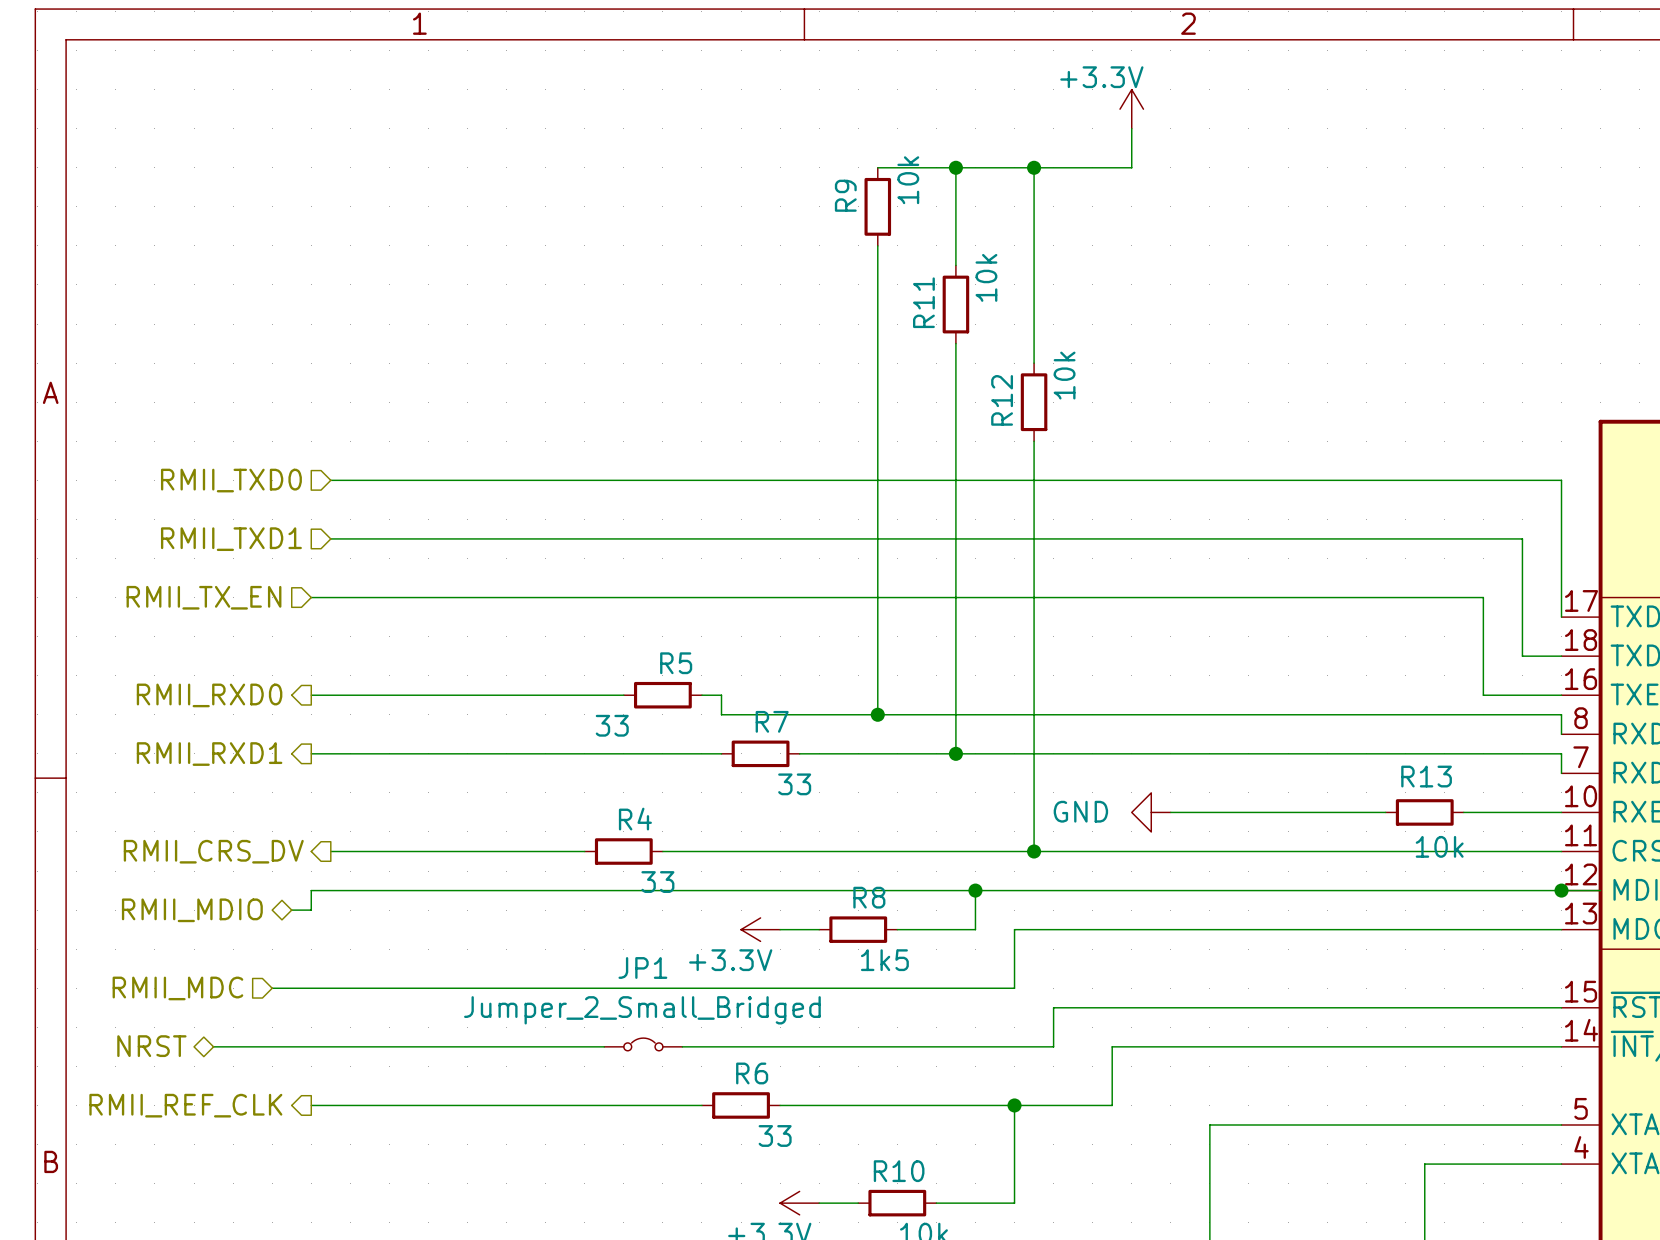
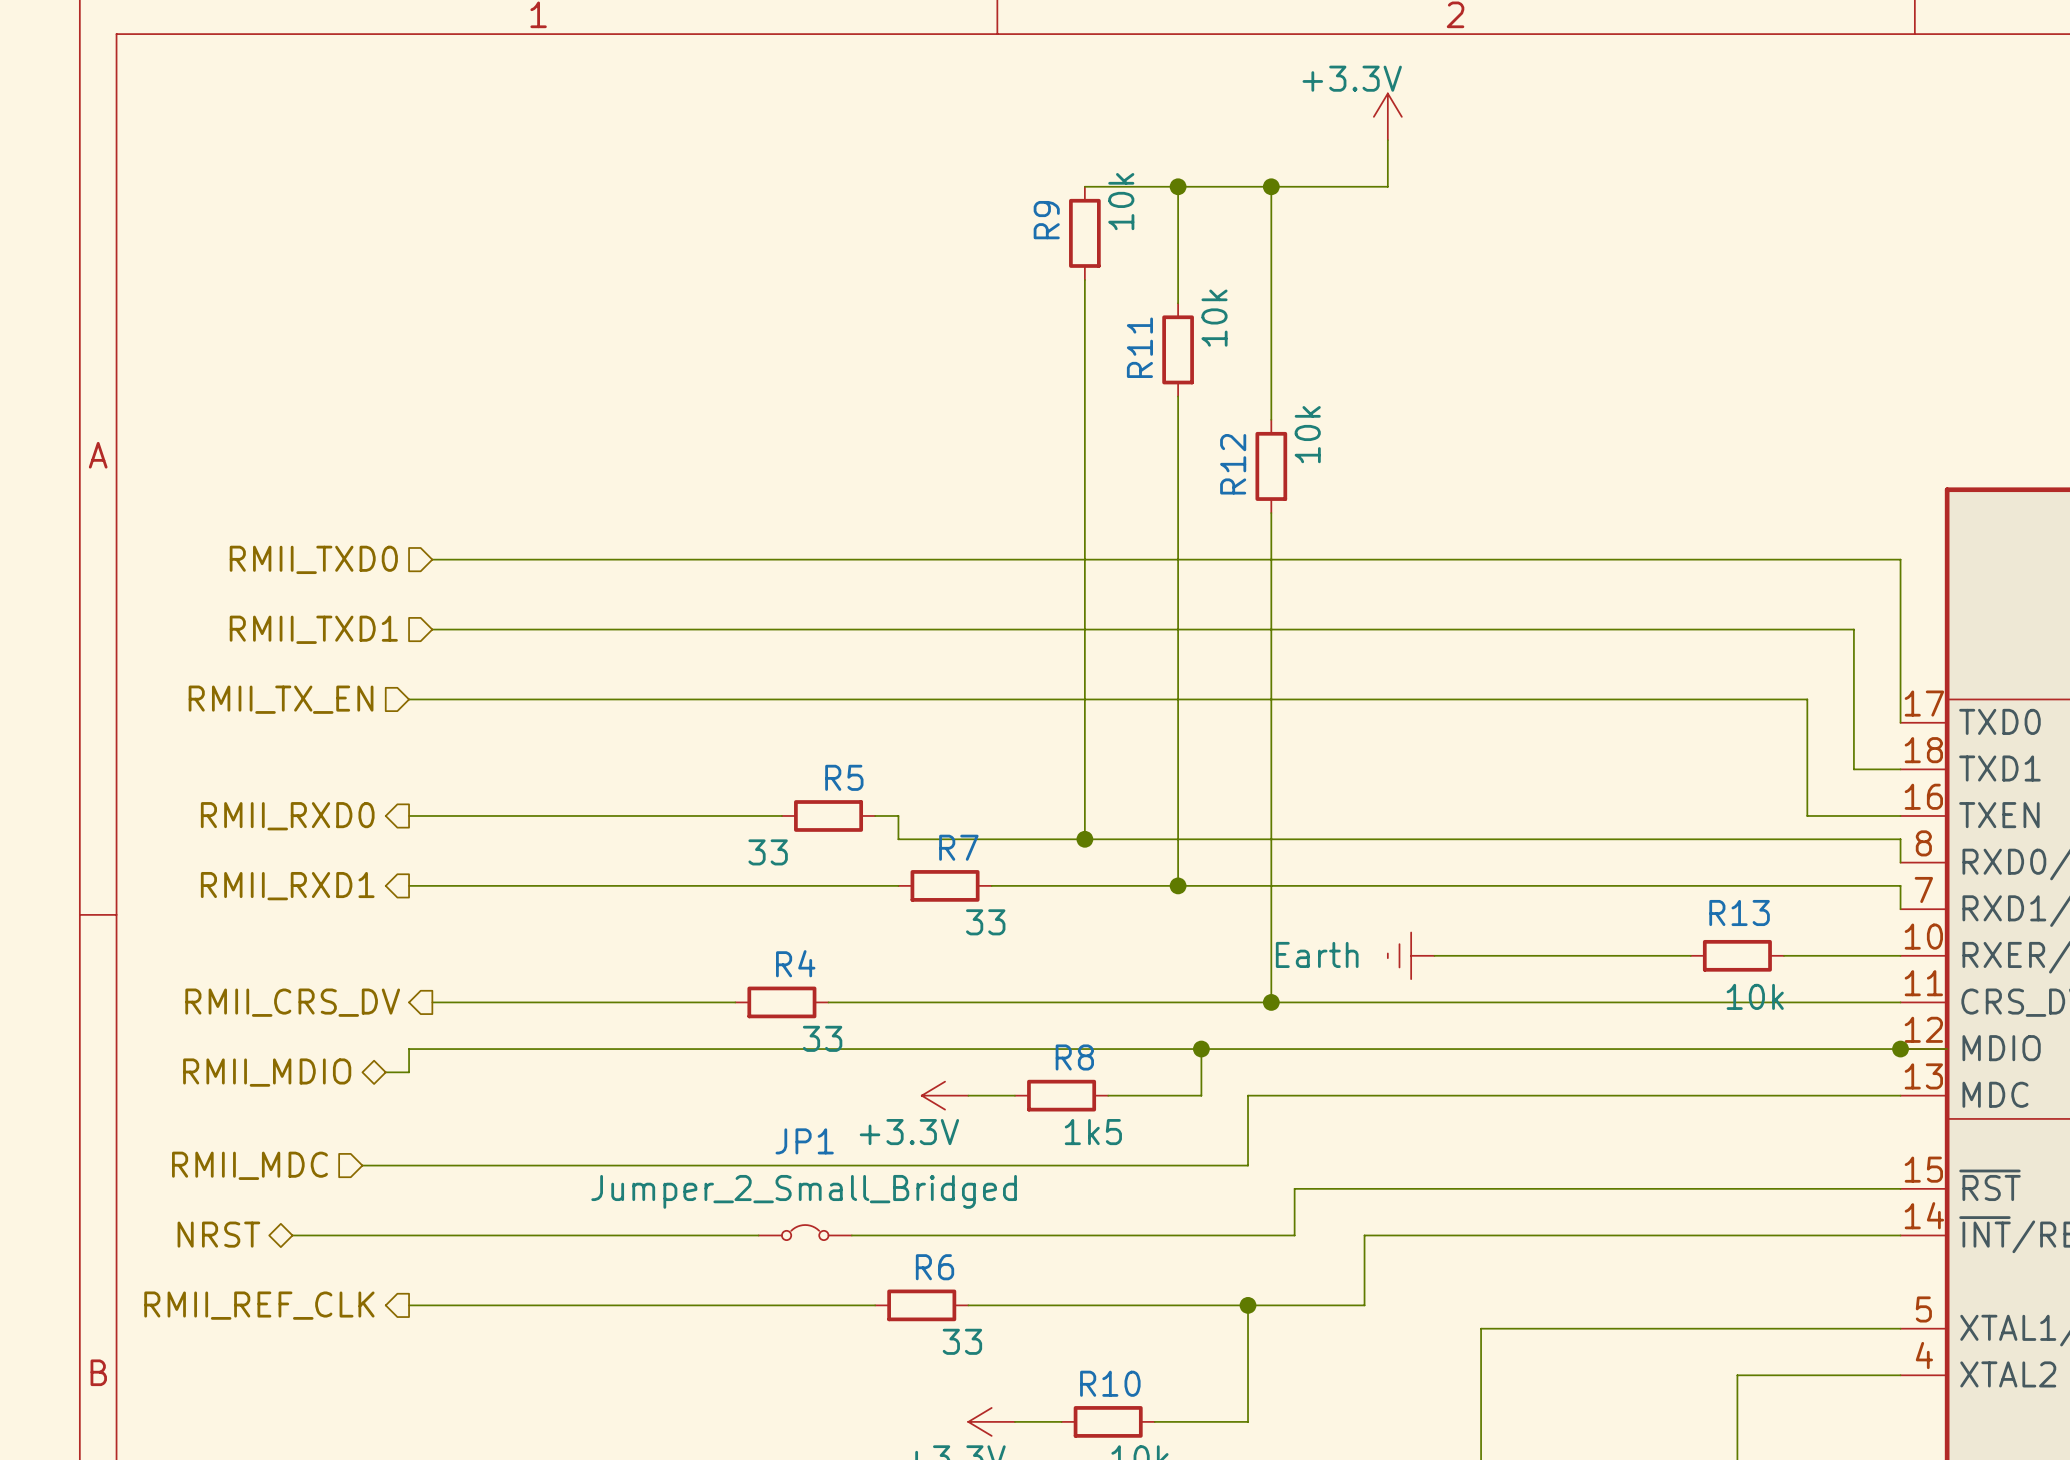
power symbol: GND (1151, 812) -> Earth (1411, 955)

